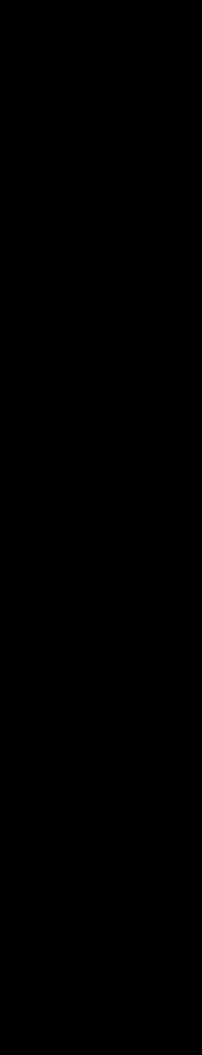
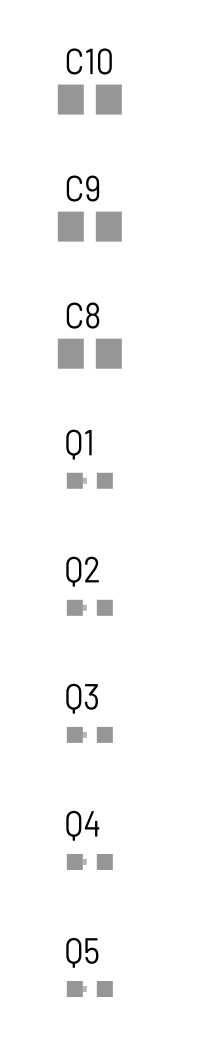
C10: none -> (89, 99)
C9: none -> (89, 226)
C8: none -> (89, 353)
Q1: none -> (89, 480)
Q2: none -> (89, 607)
Q3: none -> (89, 734)
Q4: none -> (89, 861)
Q5: none -> (89, 989)

